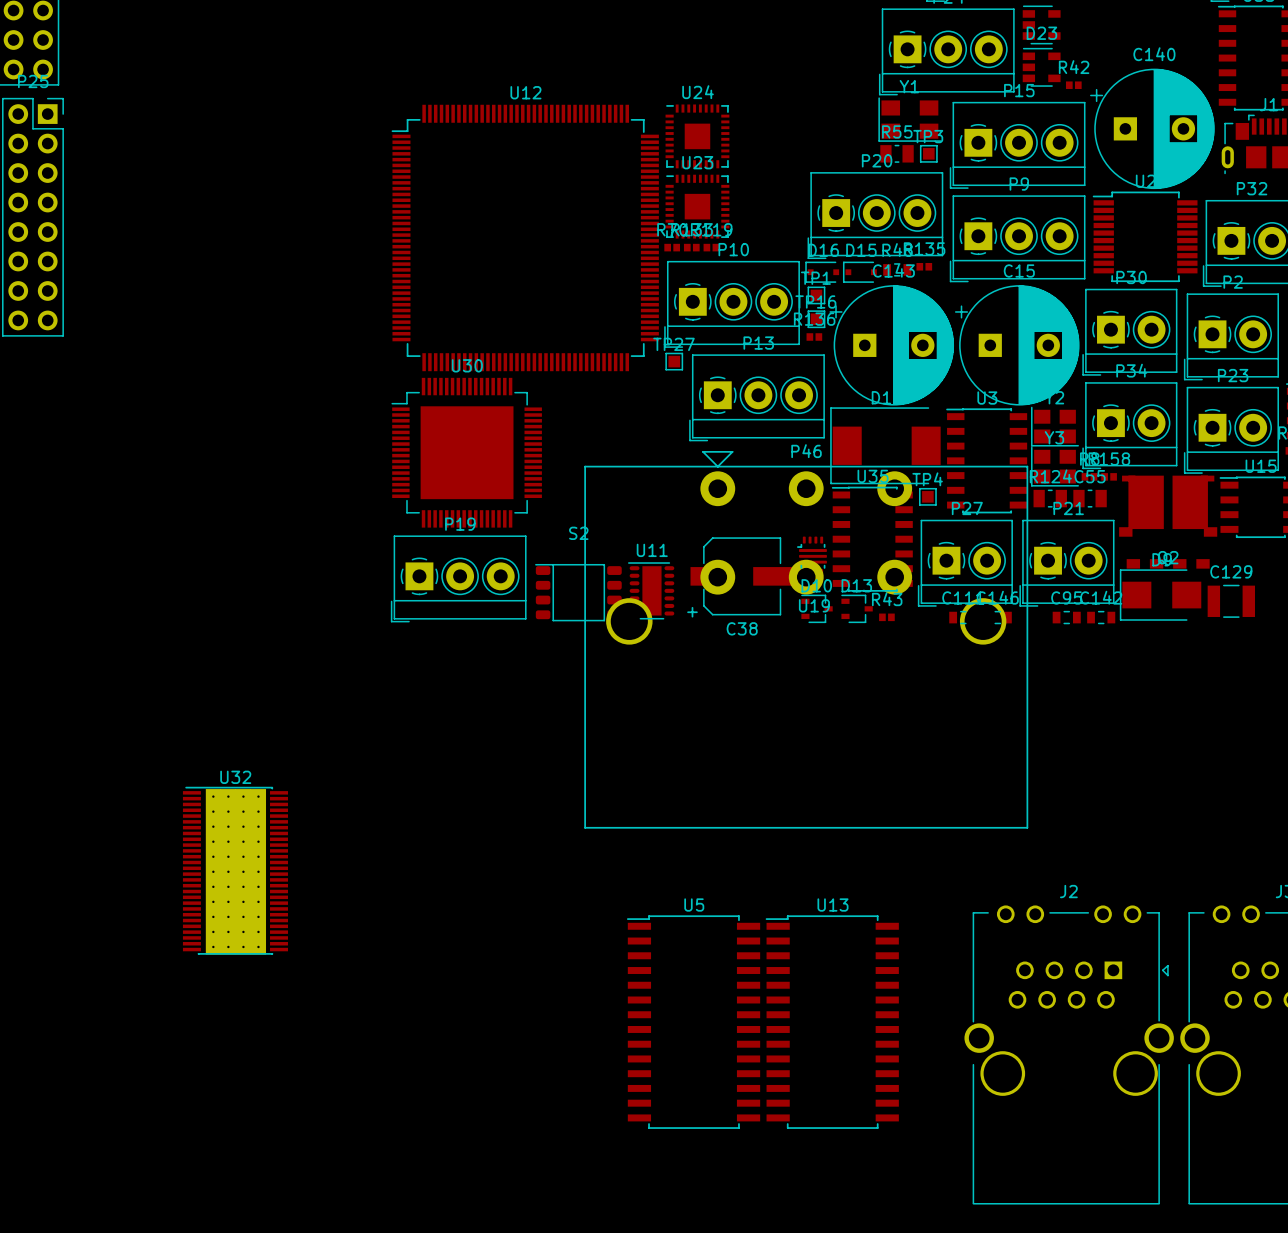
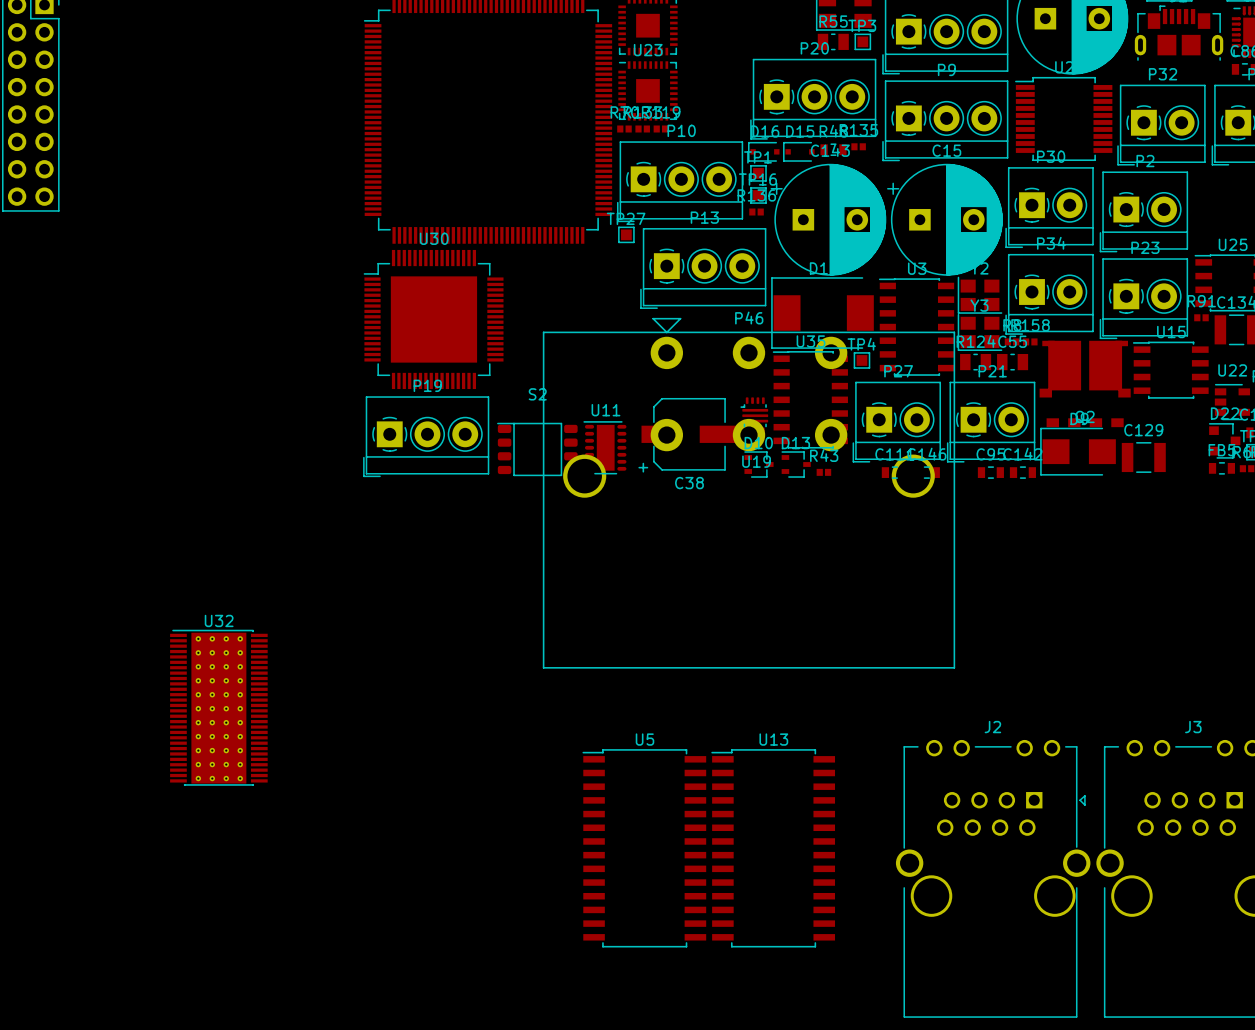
U32 footprint: [182, 786, 289, 955] -> [170, 629, 268, 786]

